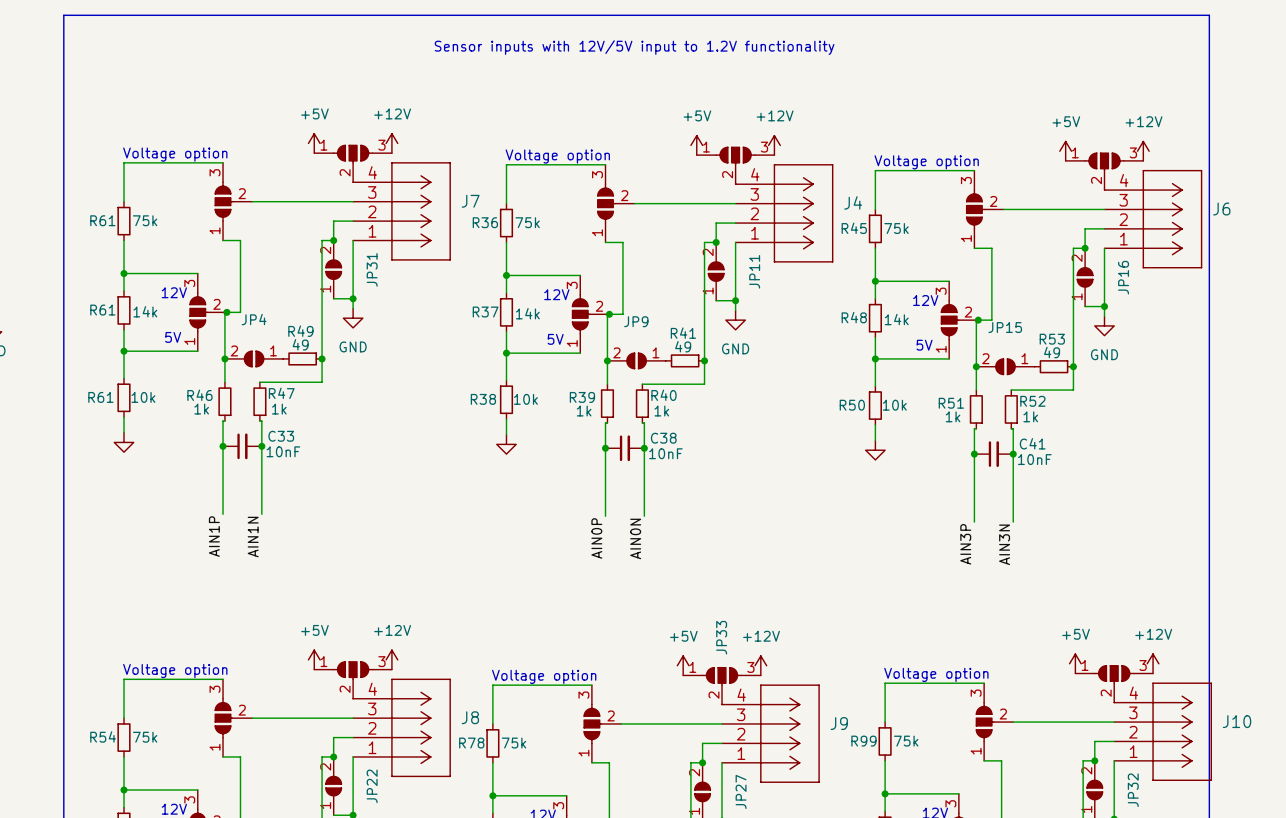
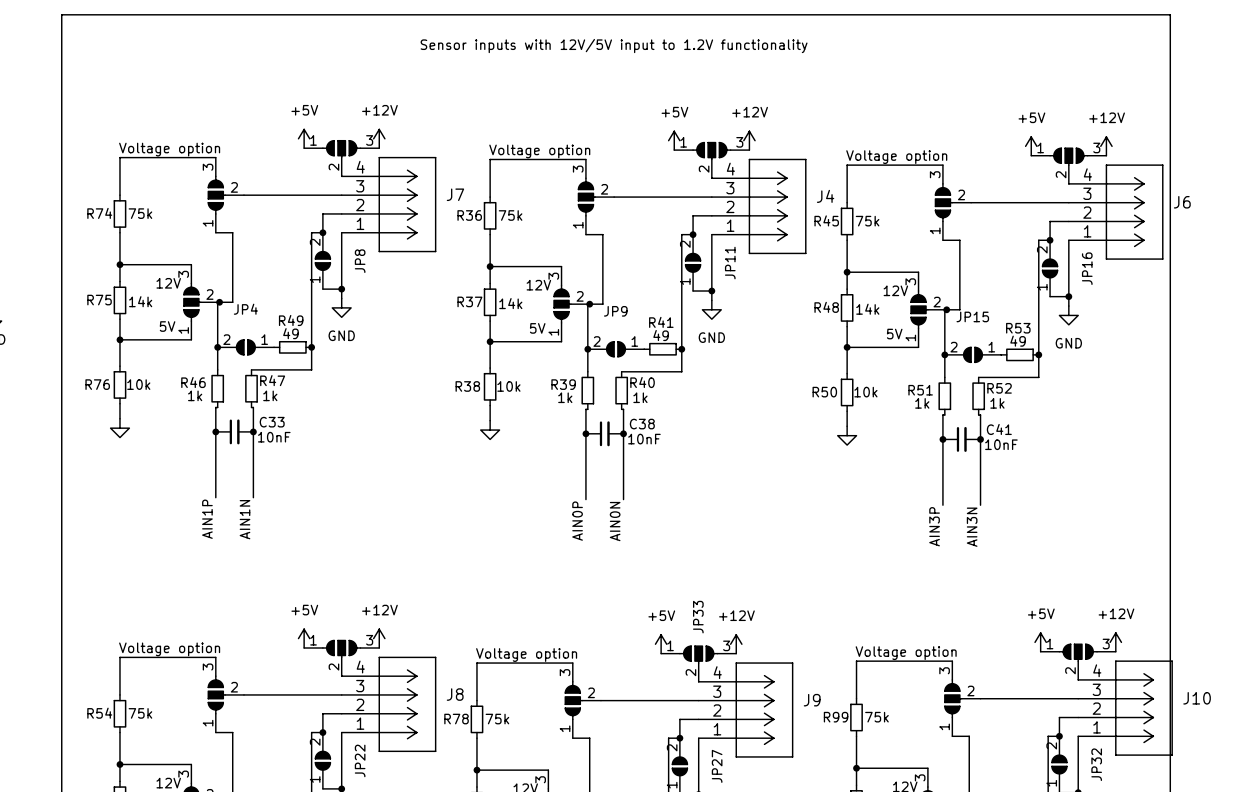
R61 name: R61 (102, 220) -> R74 (99, 213)
JP31 name: JP31 (372, 269) -> JP8 (360, 261)
R61 name: R61 (102, 310) -> R75 (99, 300)
R61 name: R61 (100, 397) -> R76 (97, 384)

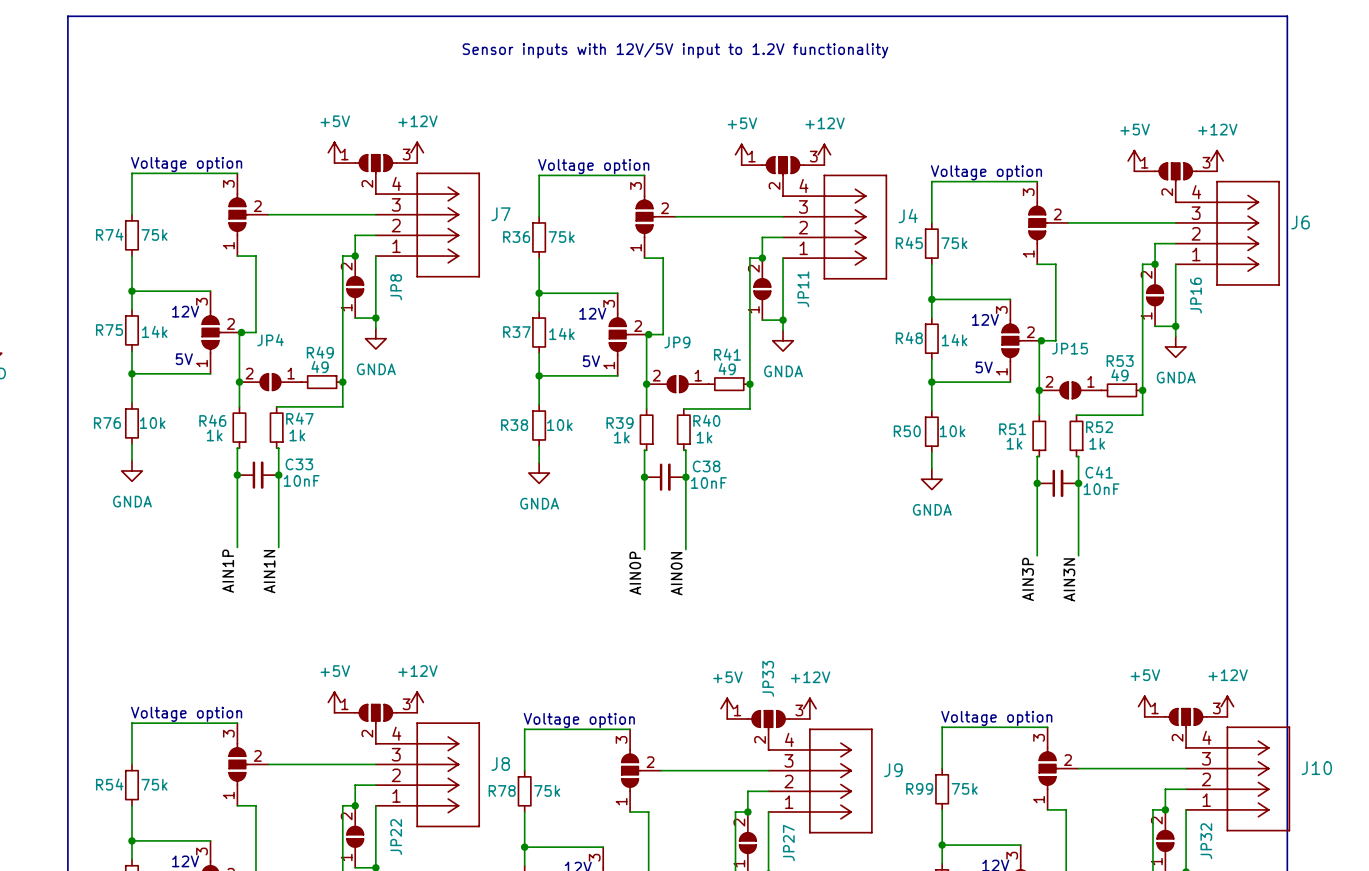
power symbol: GND (341, 307) -> GNDA (375, 338)
power symbol: GND (711, 309) -> GNDA (783, 340)
power symbol: GND (1068, 315) -> GNDA (1175, 346)
power symbol text: none -> GNDA (132, 501)
power symbol text: none -> GNDA (539, 503)
power symbol text: none -> GNDA (932, 509)

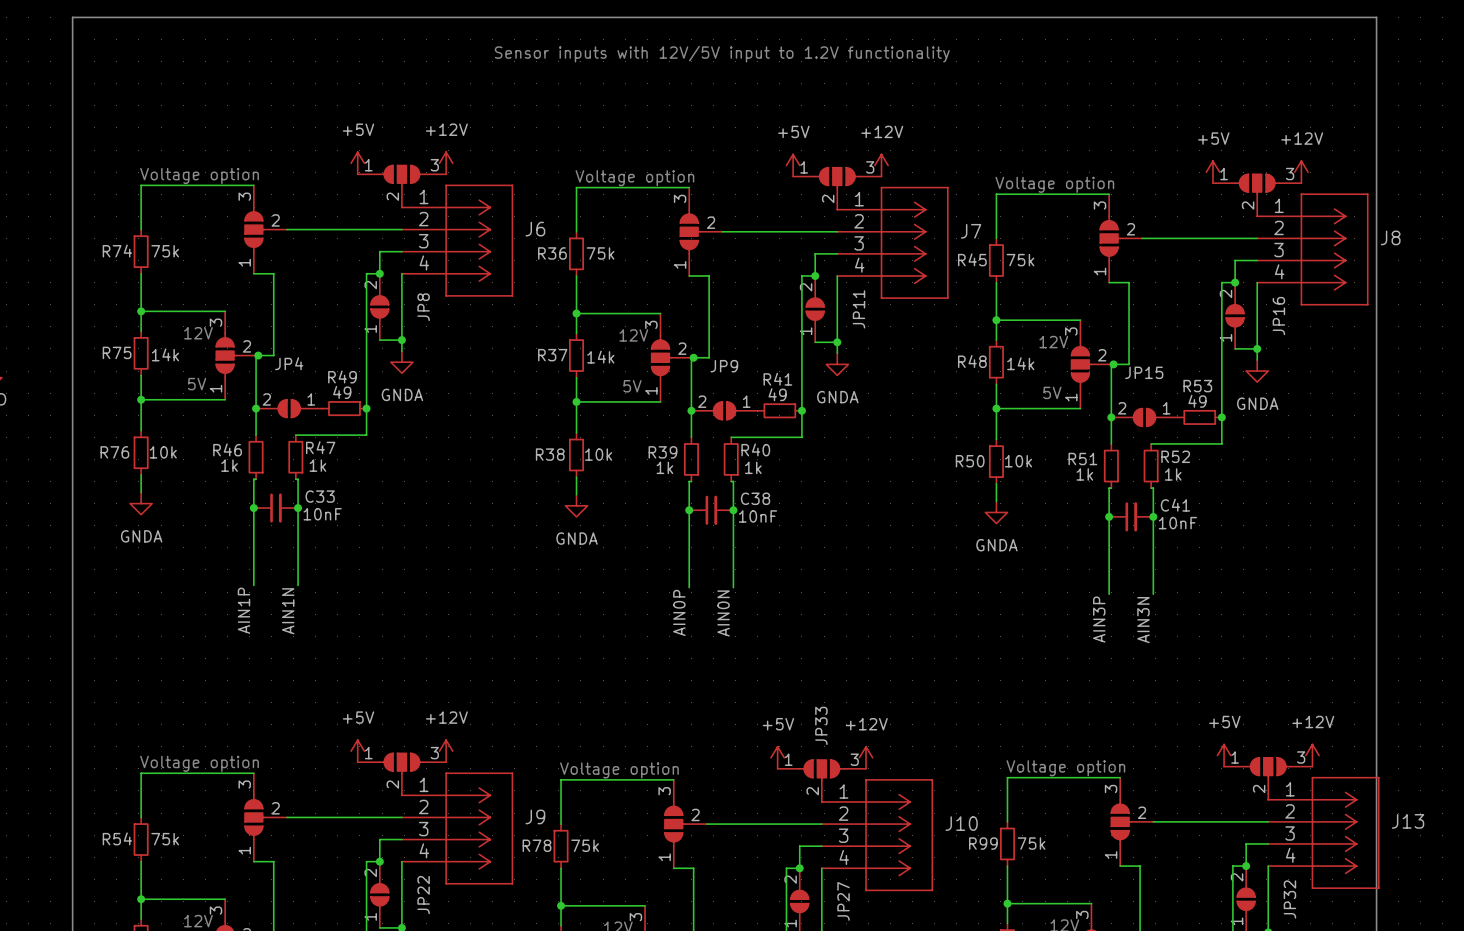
J7 position: (427, 225) -> (892, 242)
J7 flip: as is (448, 225) -> up-down (914, 242)
J4: (834, 227) -> none
J6 position: (1227, 233) -> (457, 240)
J6 flip: as is (1248, 233) -> up-down (479, 240)
J8 position: (427, 774) -> (1312, 249)
J8 flip: as is (448, 774) -> up-down (1334, 249)
J10 position: (1237, 778) -> (877, 835)
J13: none -> (1323, 832)
J10 flip: as is (1258, 778) -> up-down (899, 835)
J9 position: (820, 781) -> (457, 828)
J9 flip: as is (840, 781) -> up-down (479, 828)

